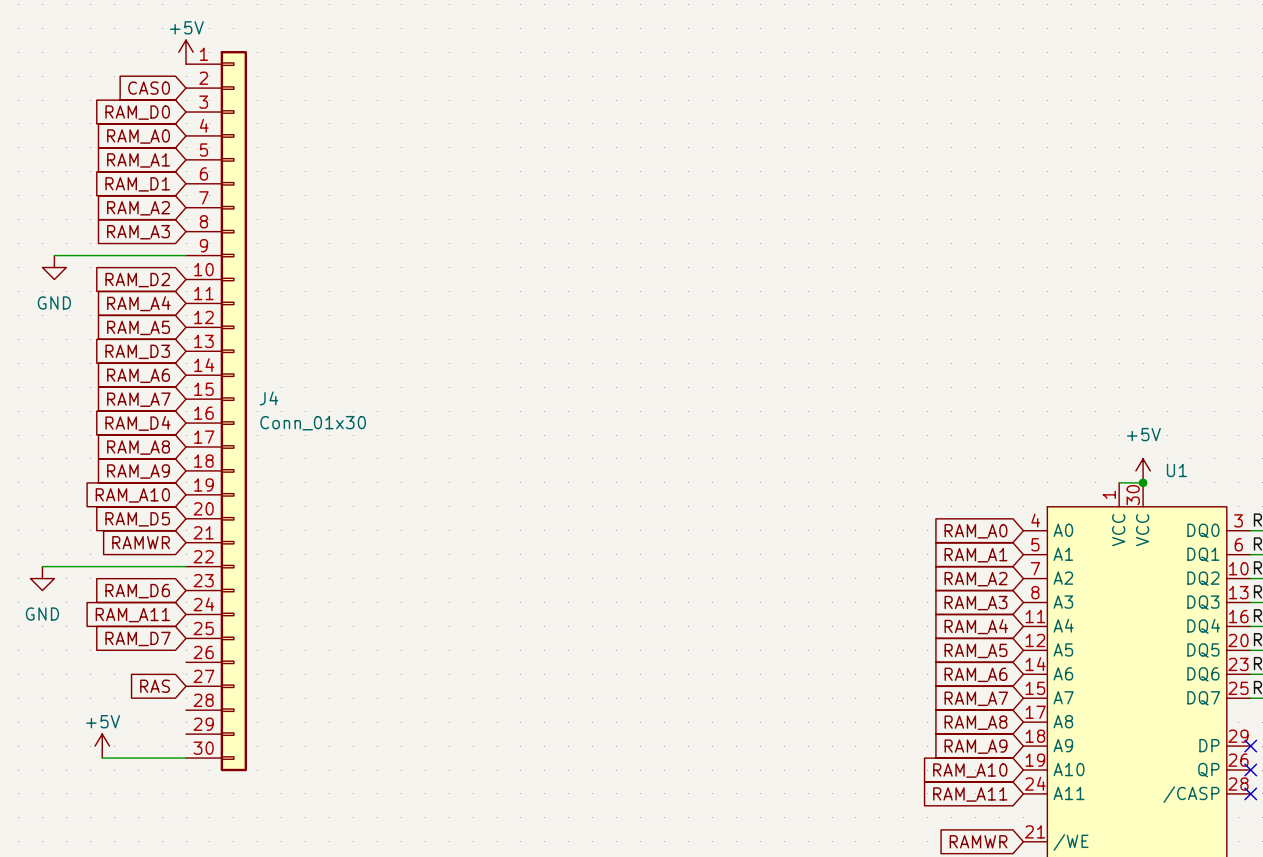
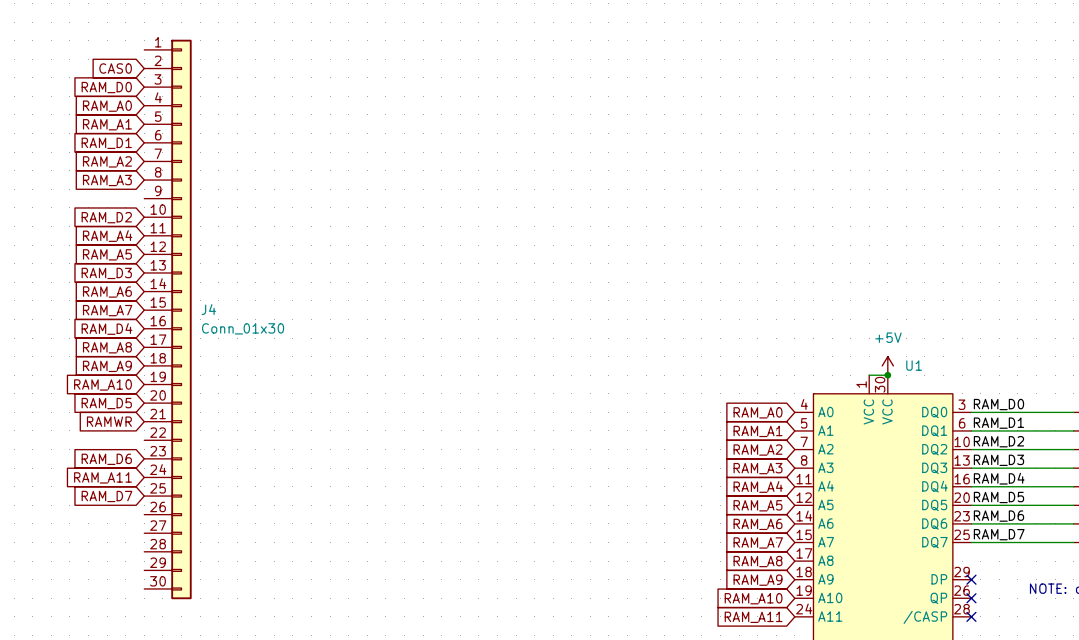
power symbol: +5V (186, 52) -> none
wire: (54, 255) (186, 255) -> none
power symbol: GND (54, 267) -> none
wire: (42, 566) (186, 566) -> none
power symbol: GND (42, 578) -> none
global label: RAS (155, 686) -> none
power symbol: +5V (102, 746) -> none
wire: (102, 758) (186, 758) -> none

